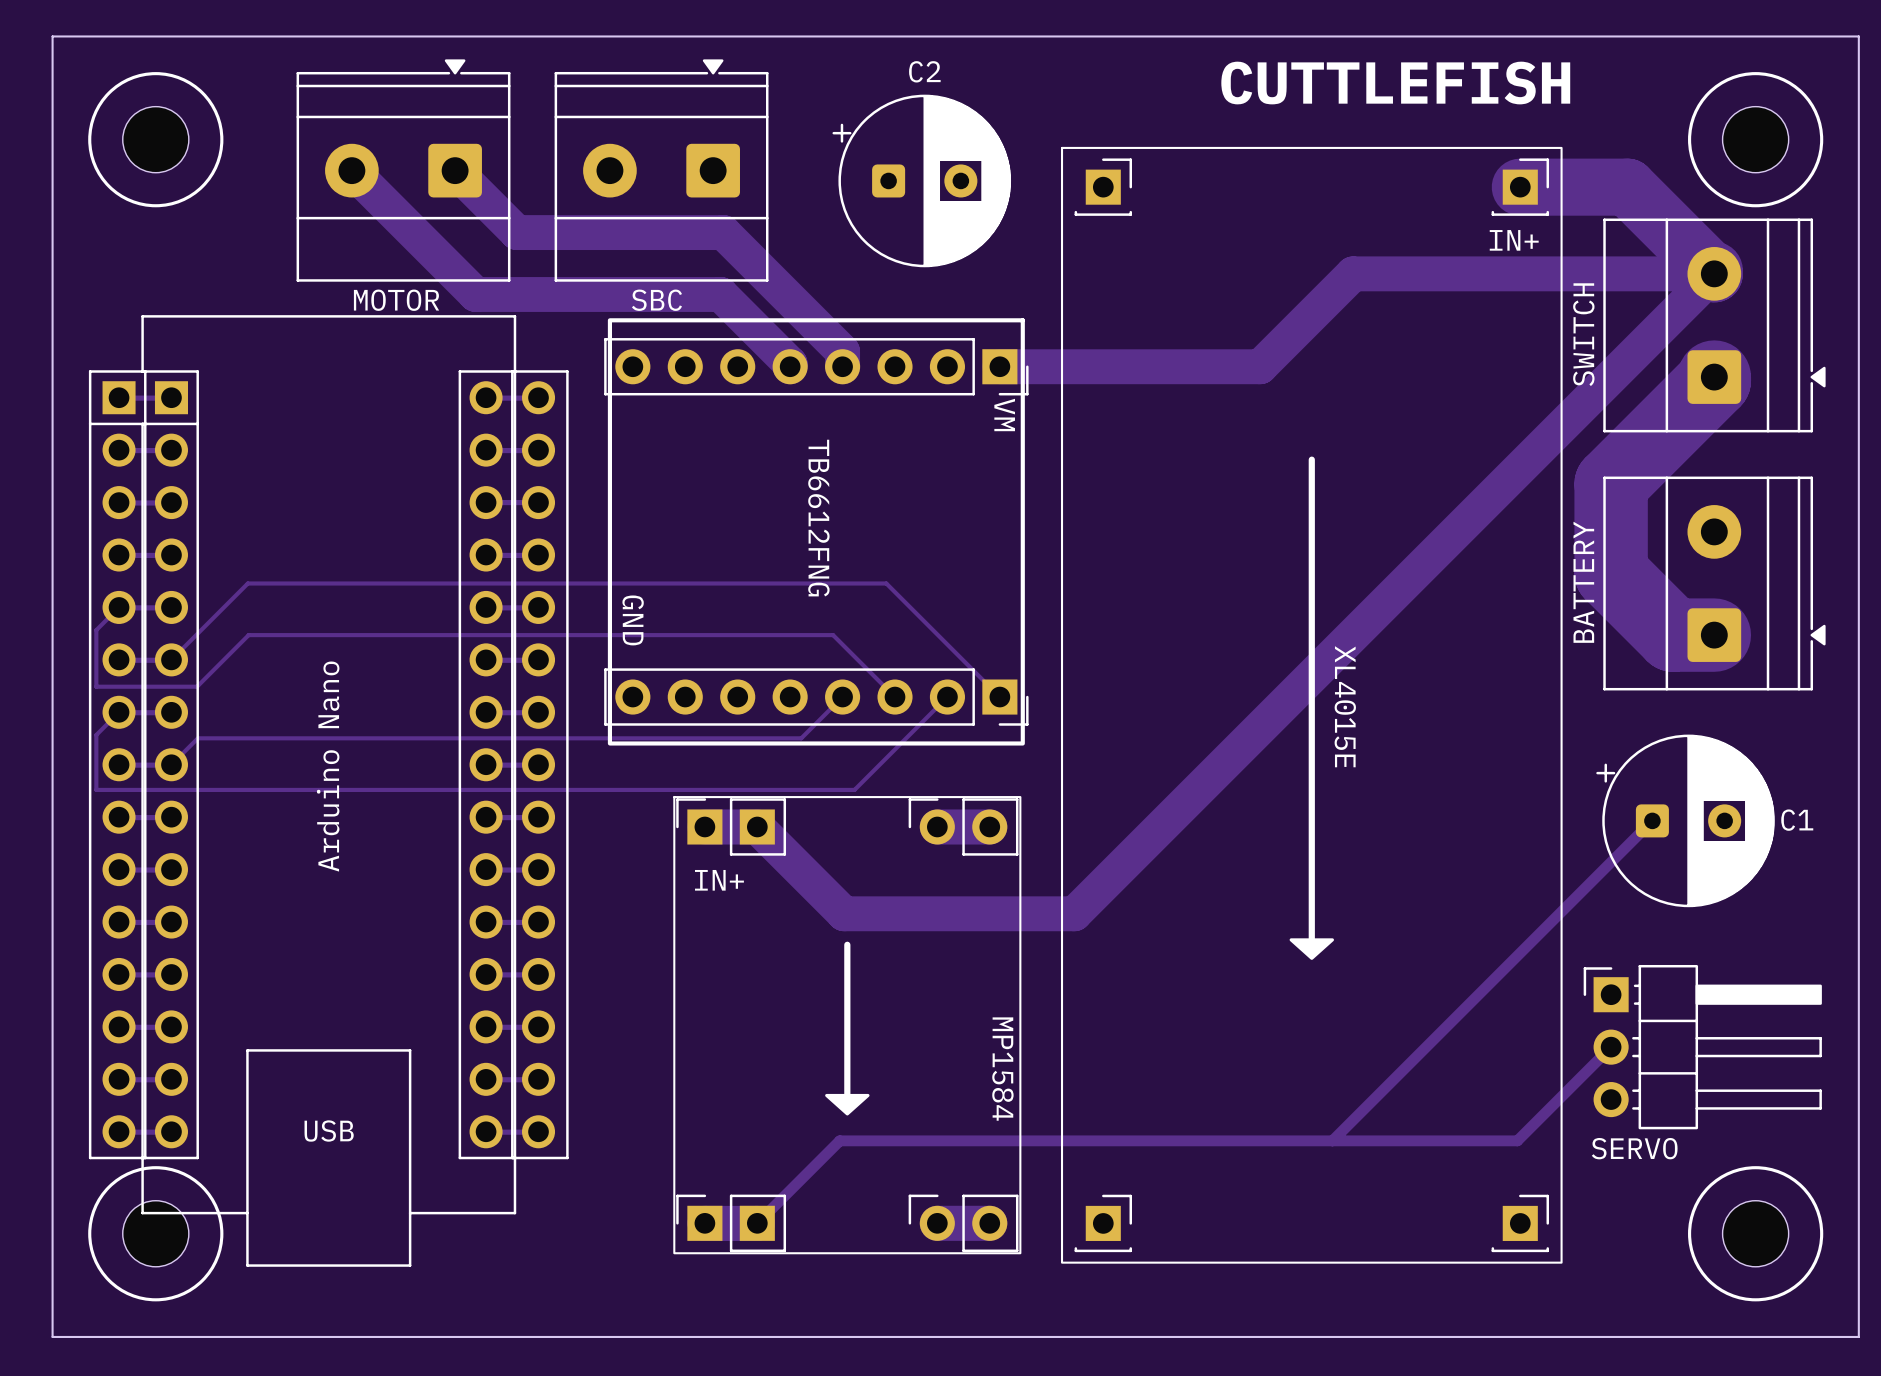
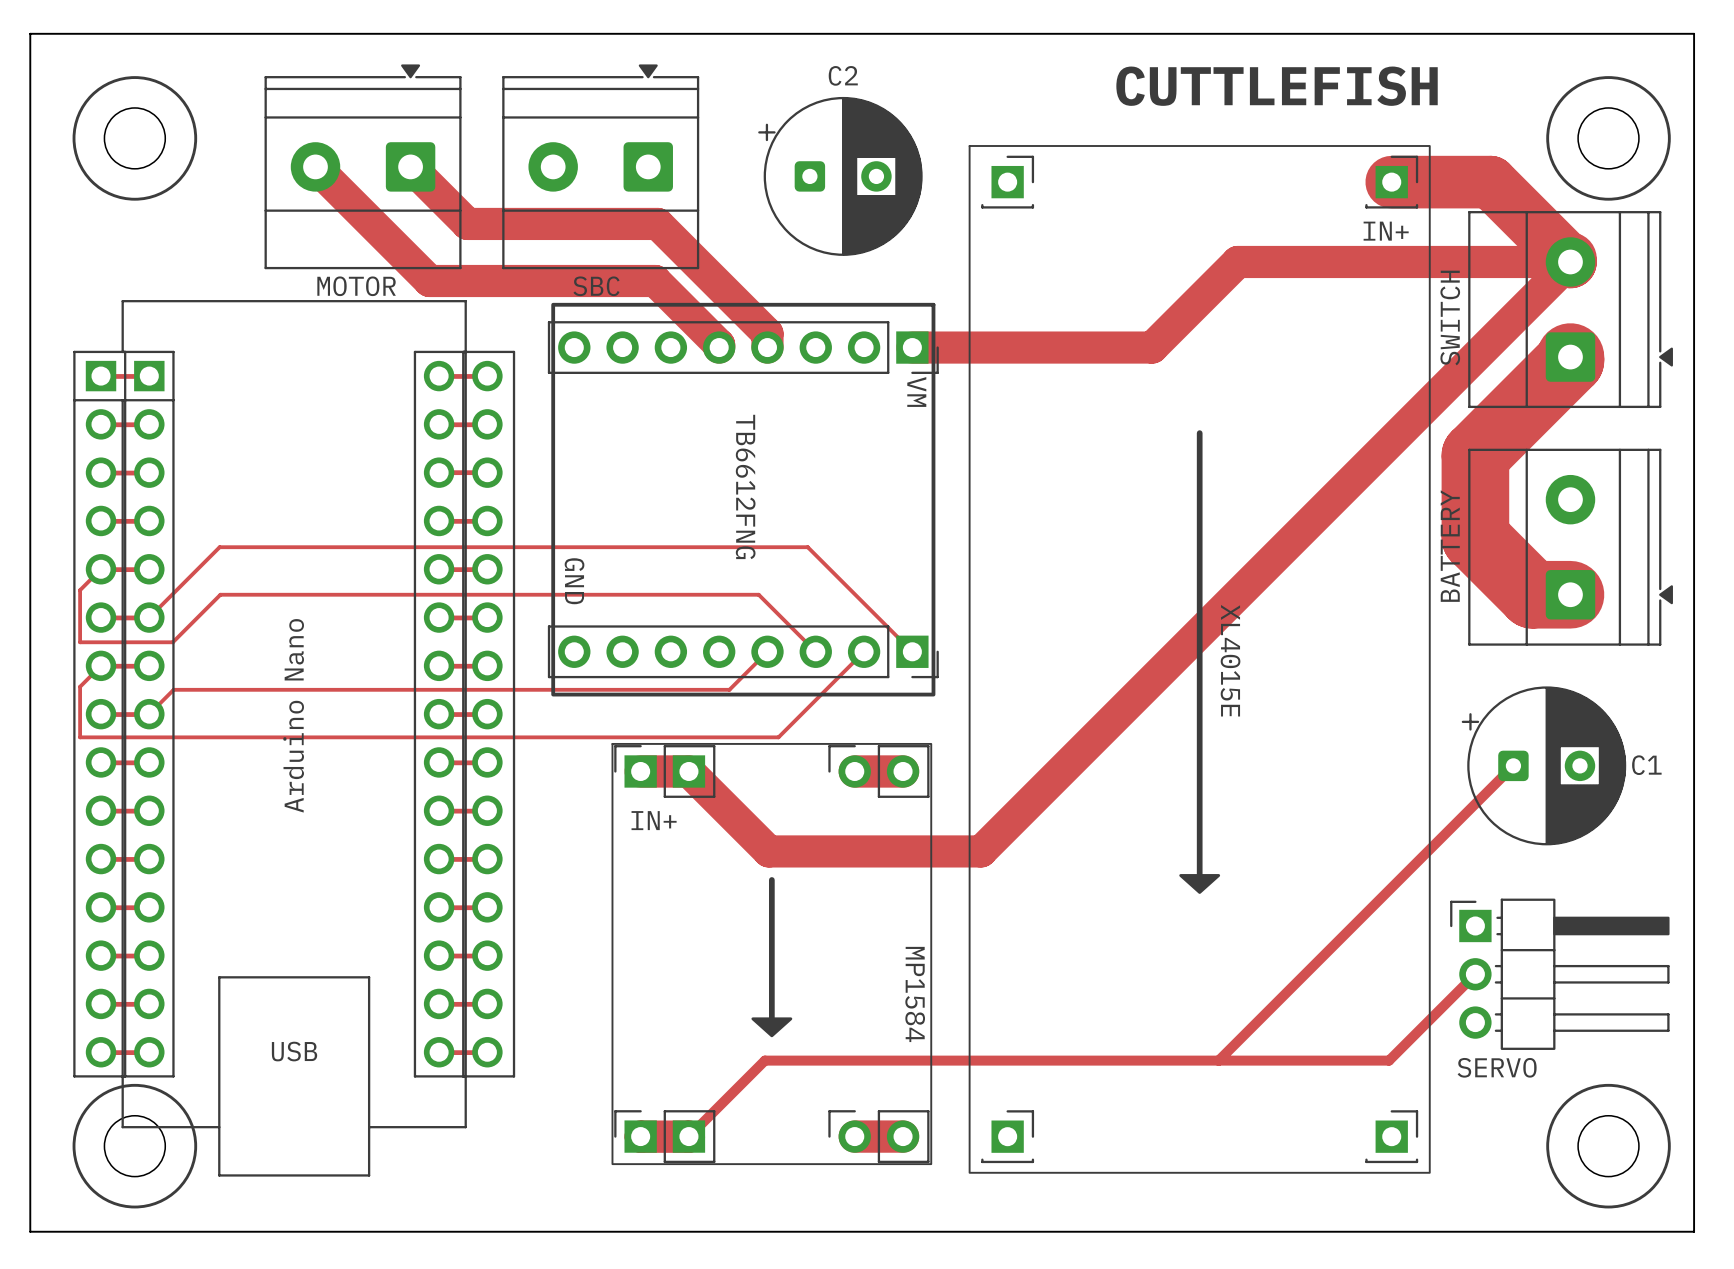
board edge: (52, 36) (1858, 36) (1858, 1336) (52, 1336) (52, 36) -> (30, 33) (1694, 33) (1694, 1231) (30, 1231) (30, 33)

